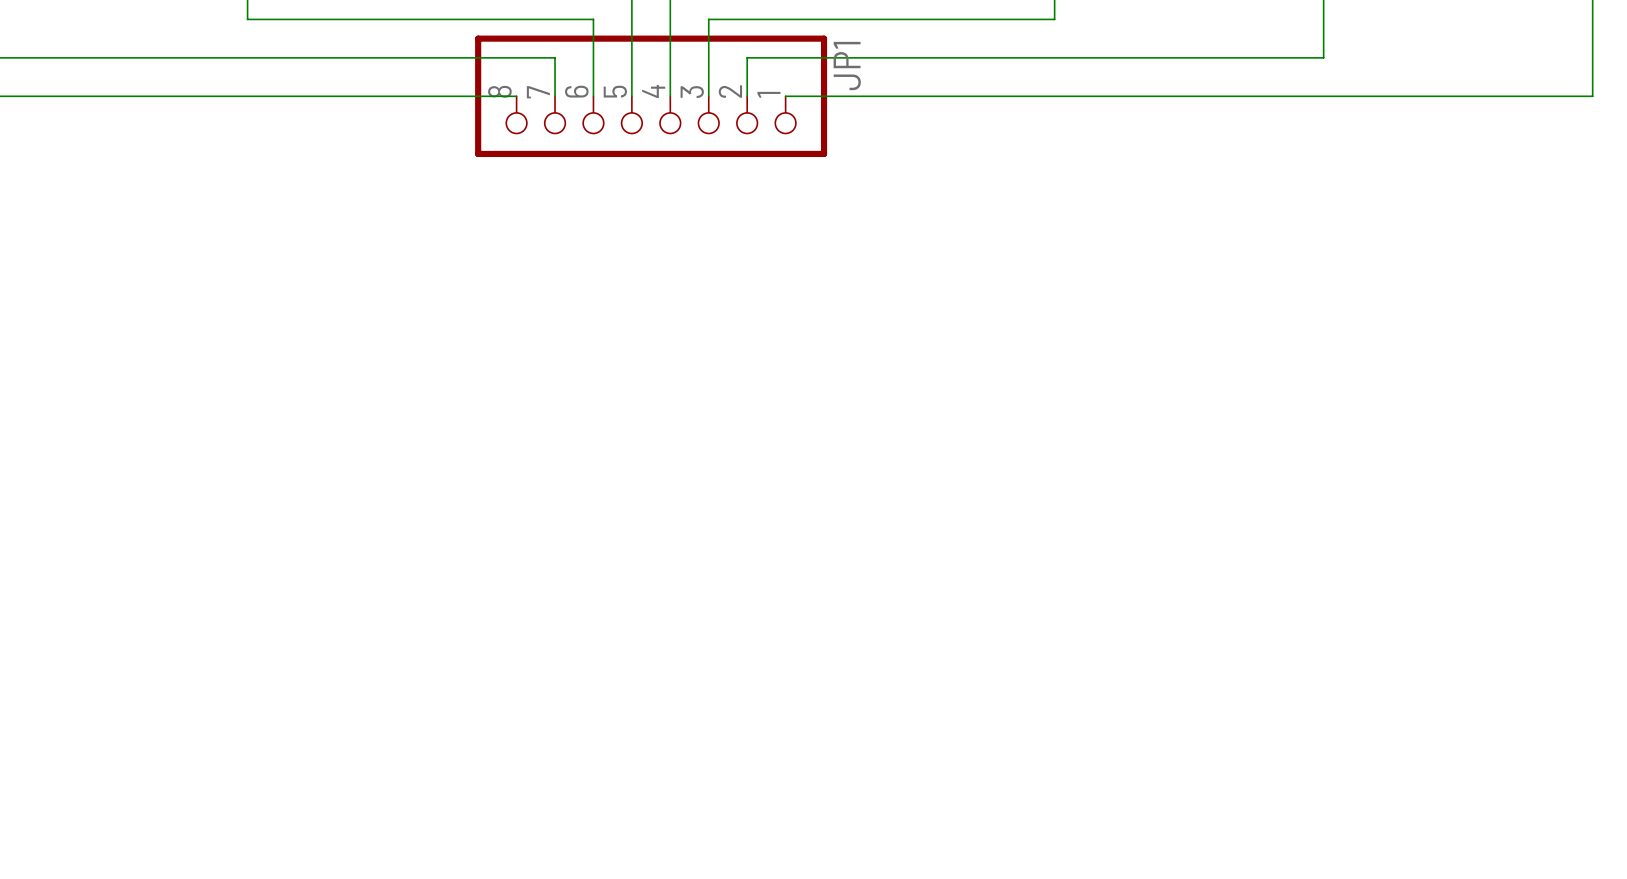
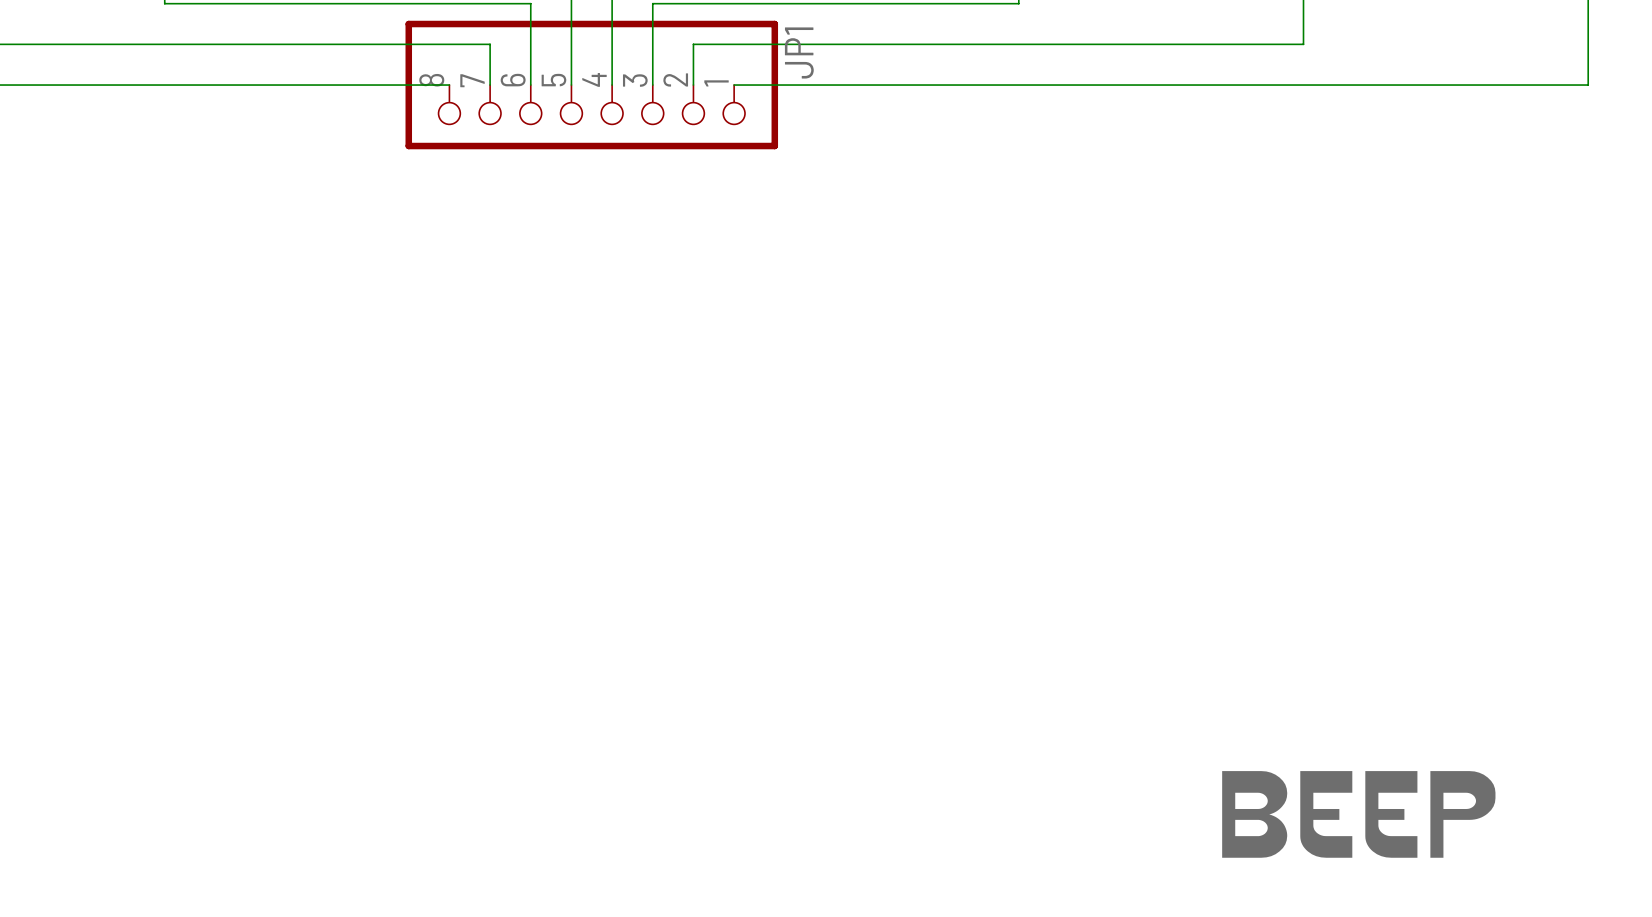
part: none -> (1358, 814)

